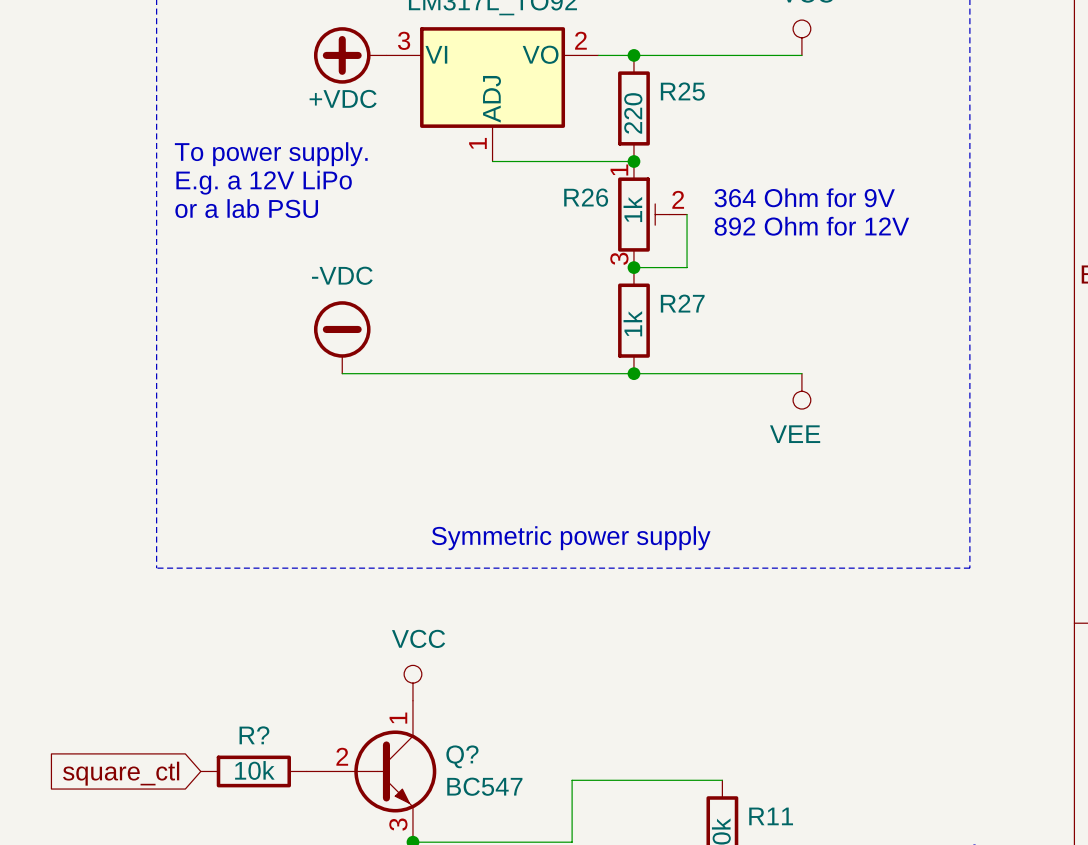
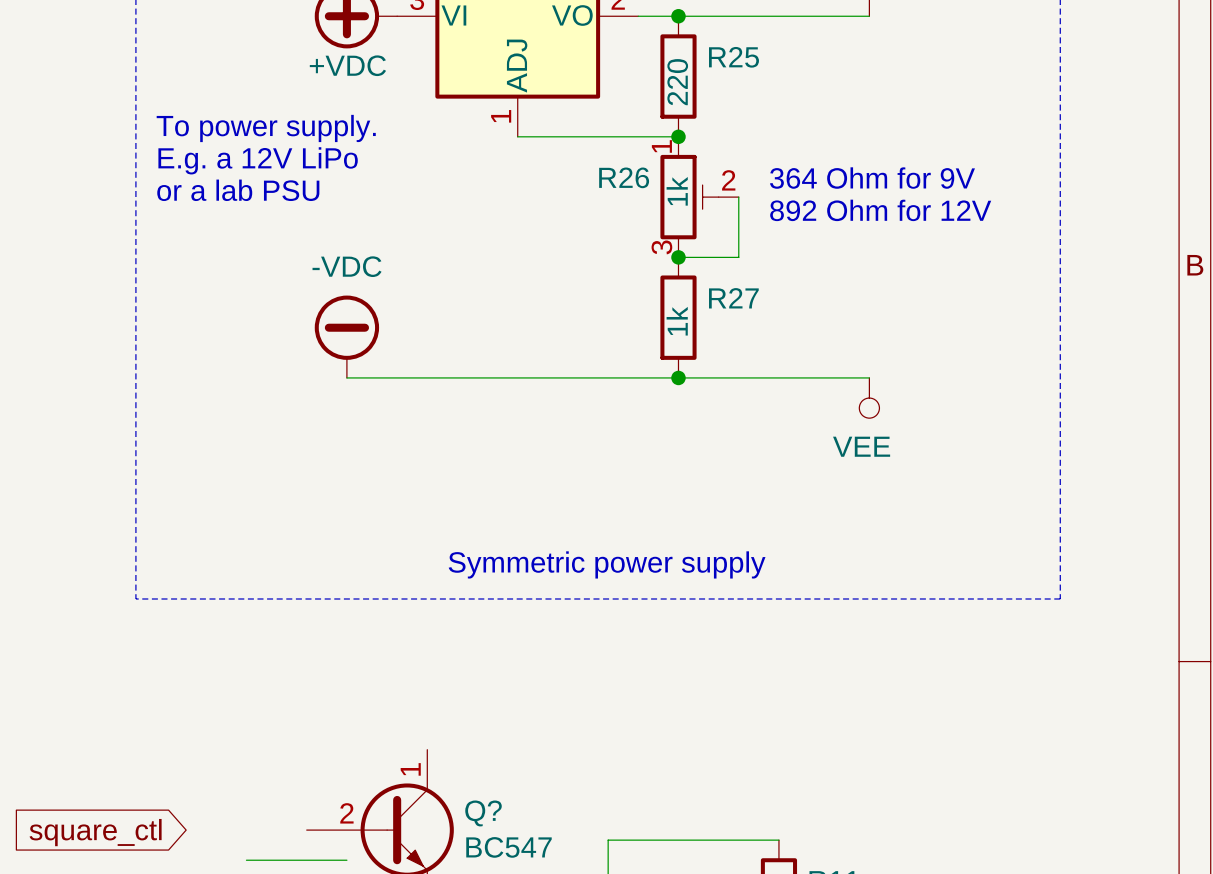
power symbol: VCC (412, 683) -> none
R?: 10k (253, 771) -> none
wire: none -> (246, 860) (346, 860)

